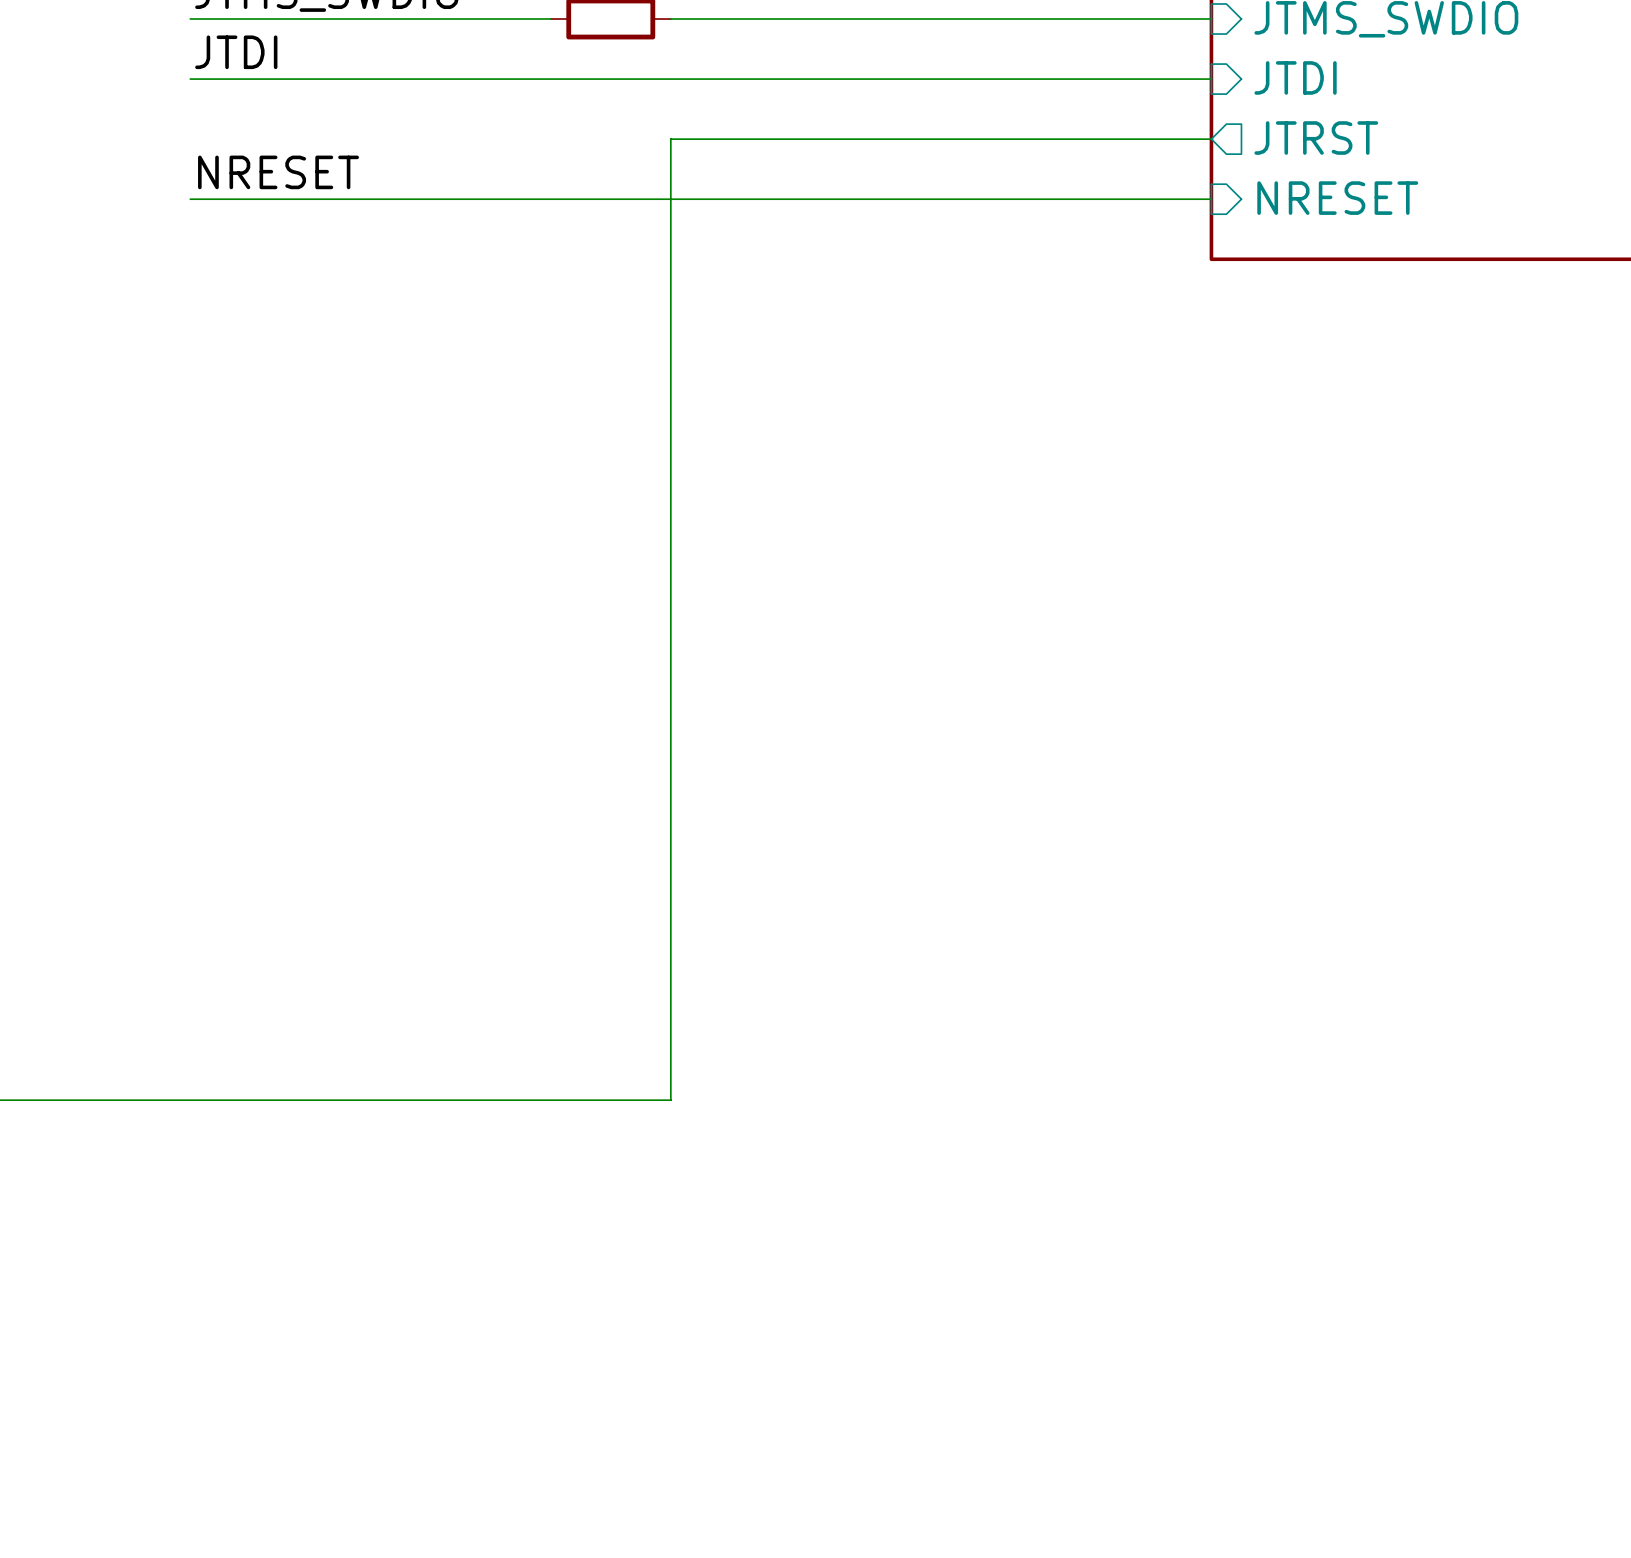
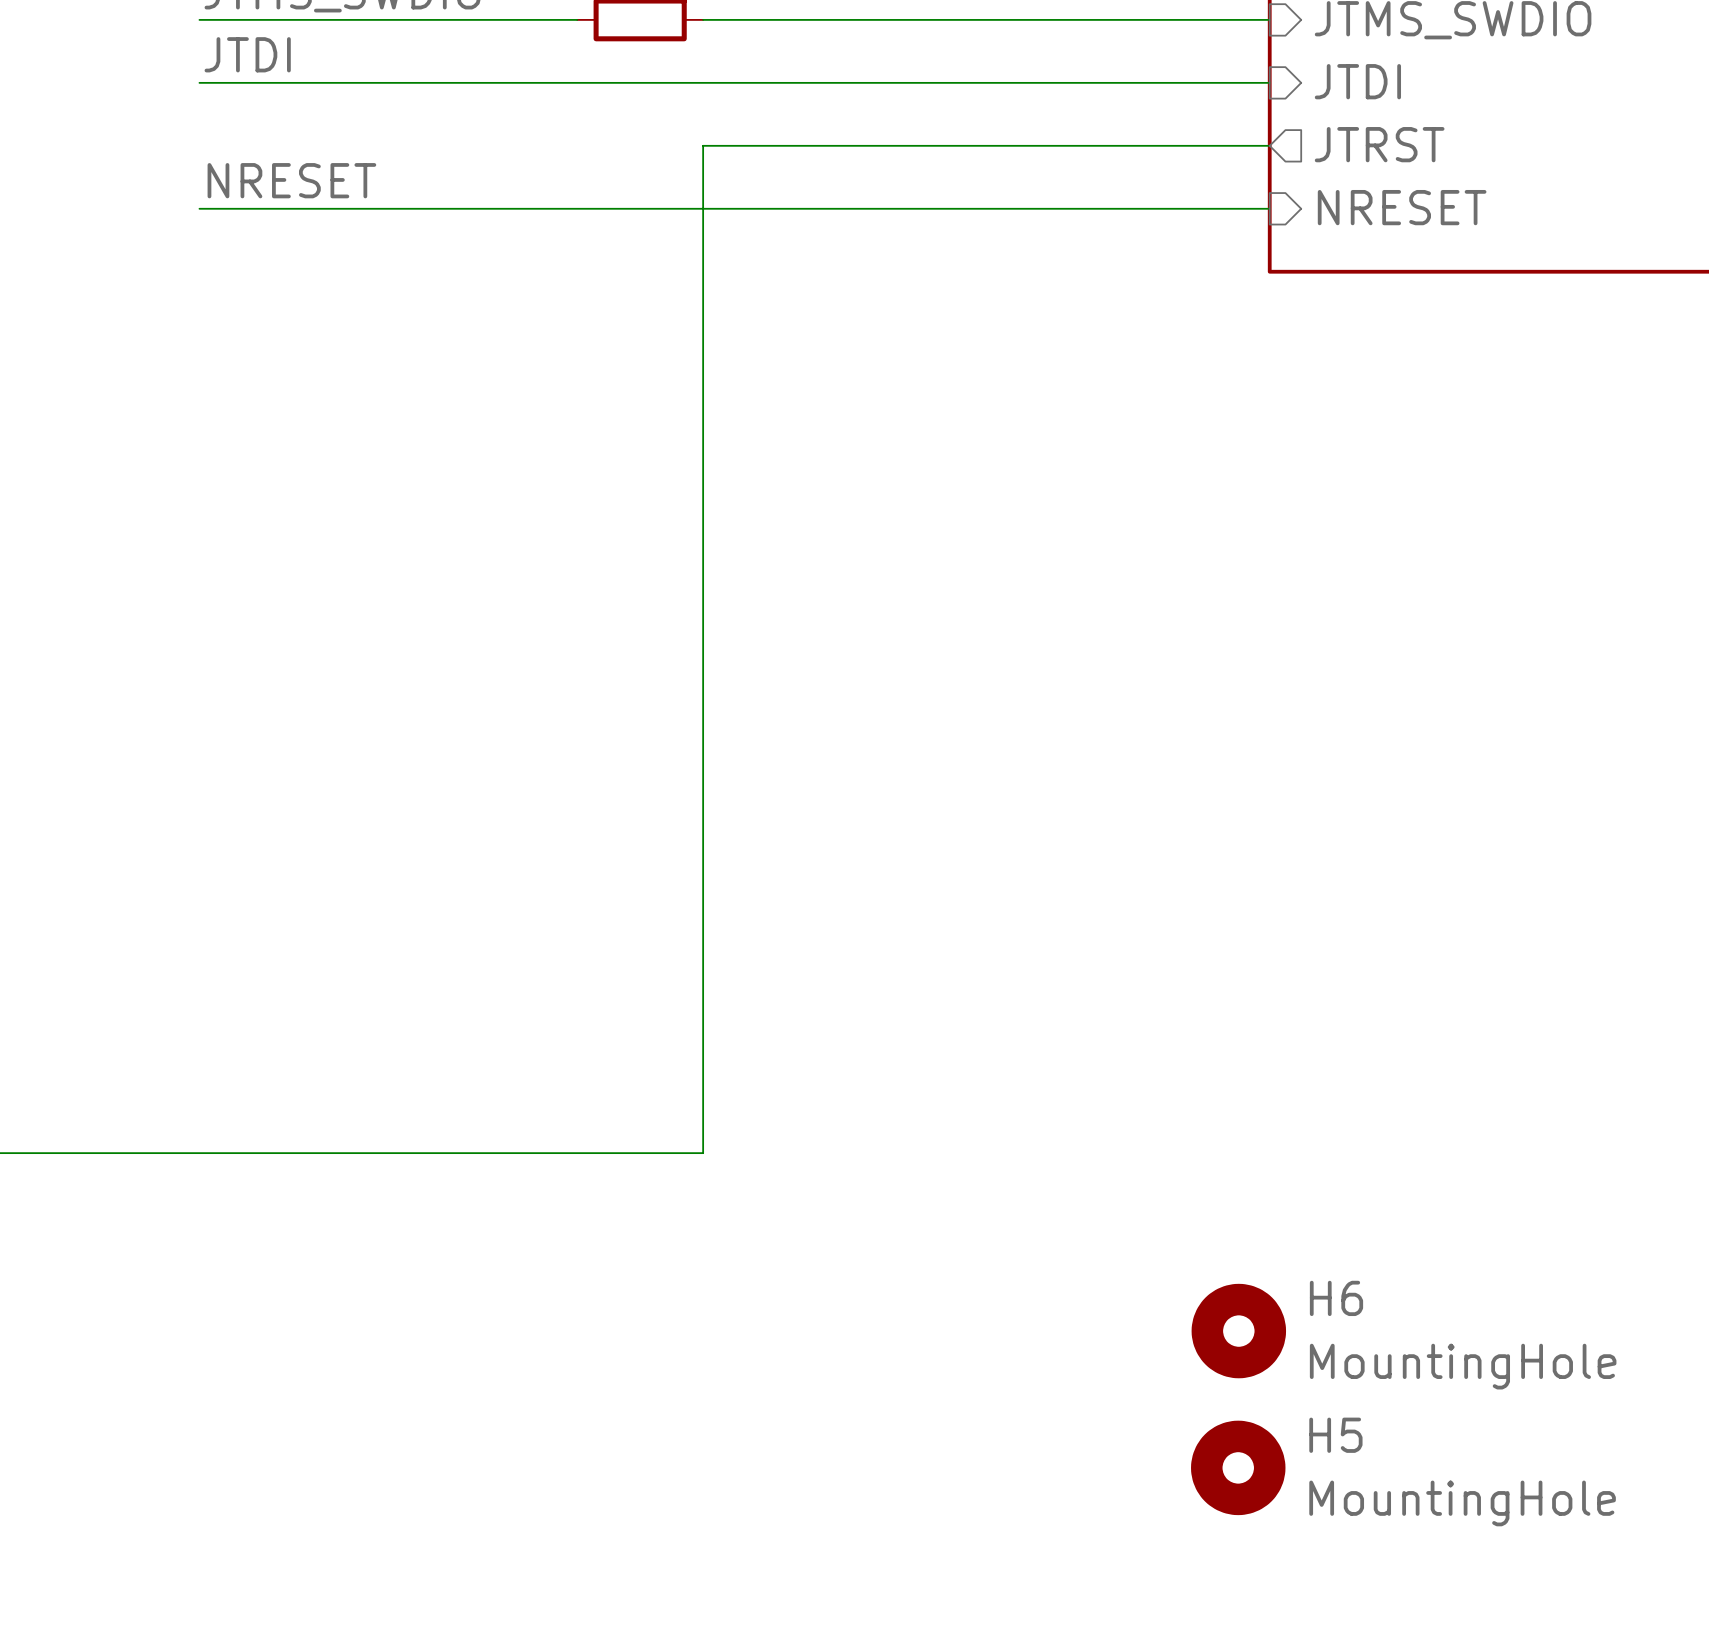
H6: none -> MountingHole (1238, 1331)
H5: none -> MountingHole (1238, 1467)

